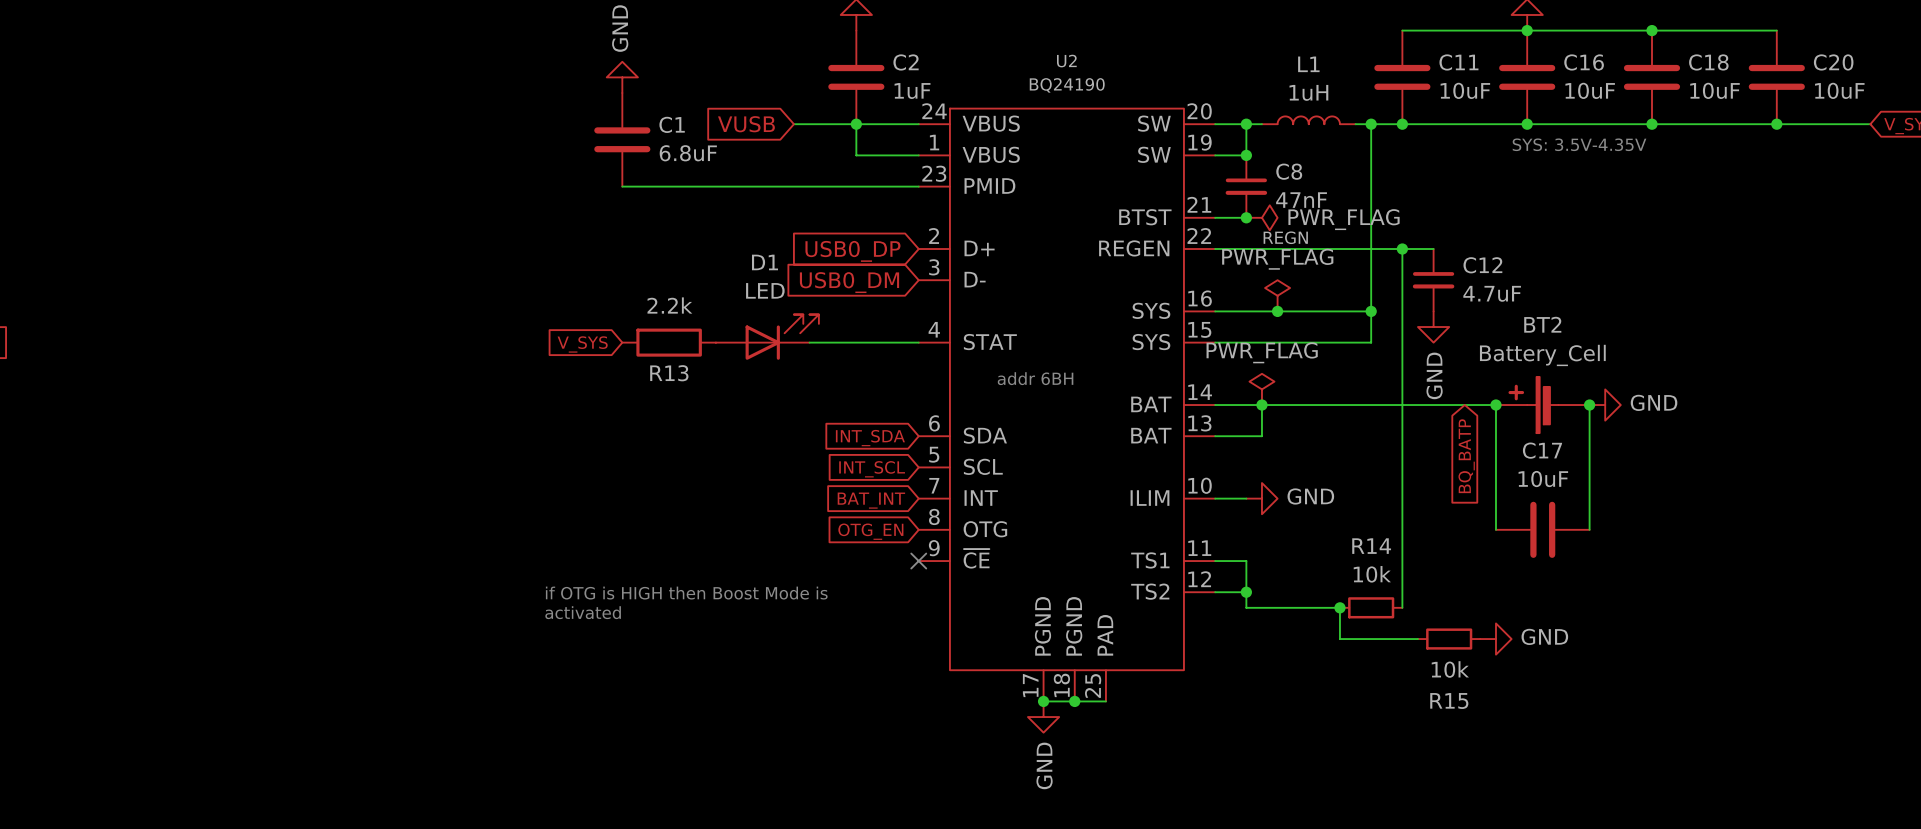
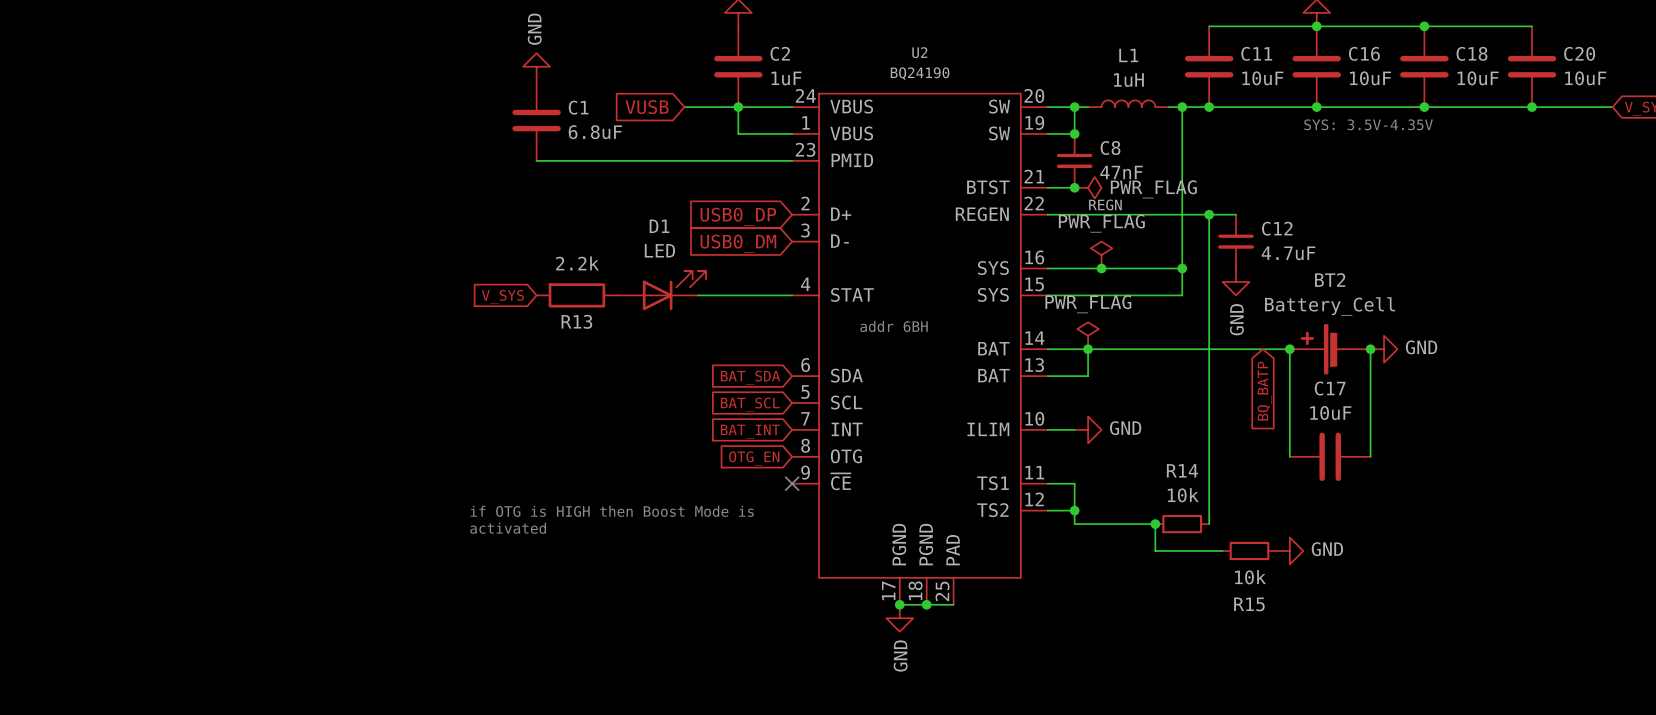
global label: INT_SDA (870, 438) -> BAT_SDA (750, 377)
global label: INT_SCL (872, 469) -> BAT_SCL (750, 404)

